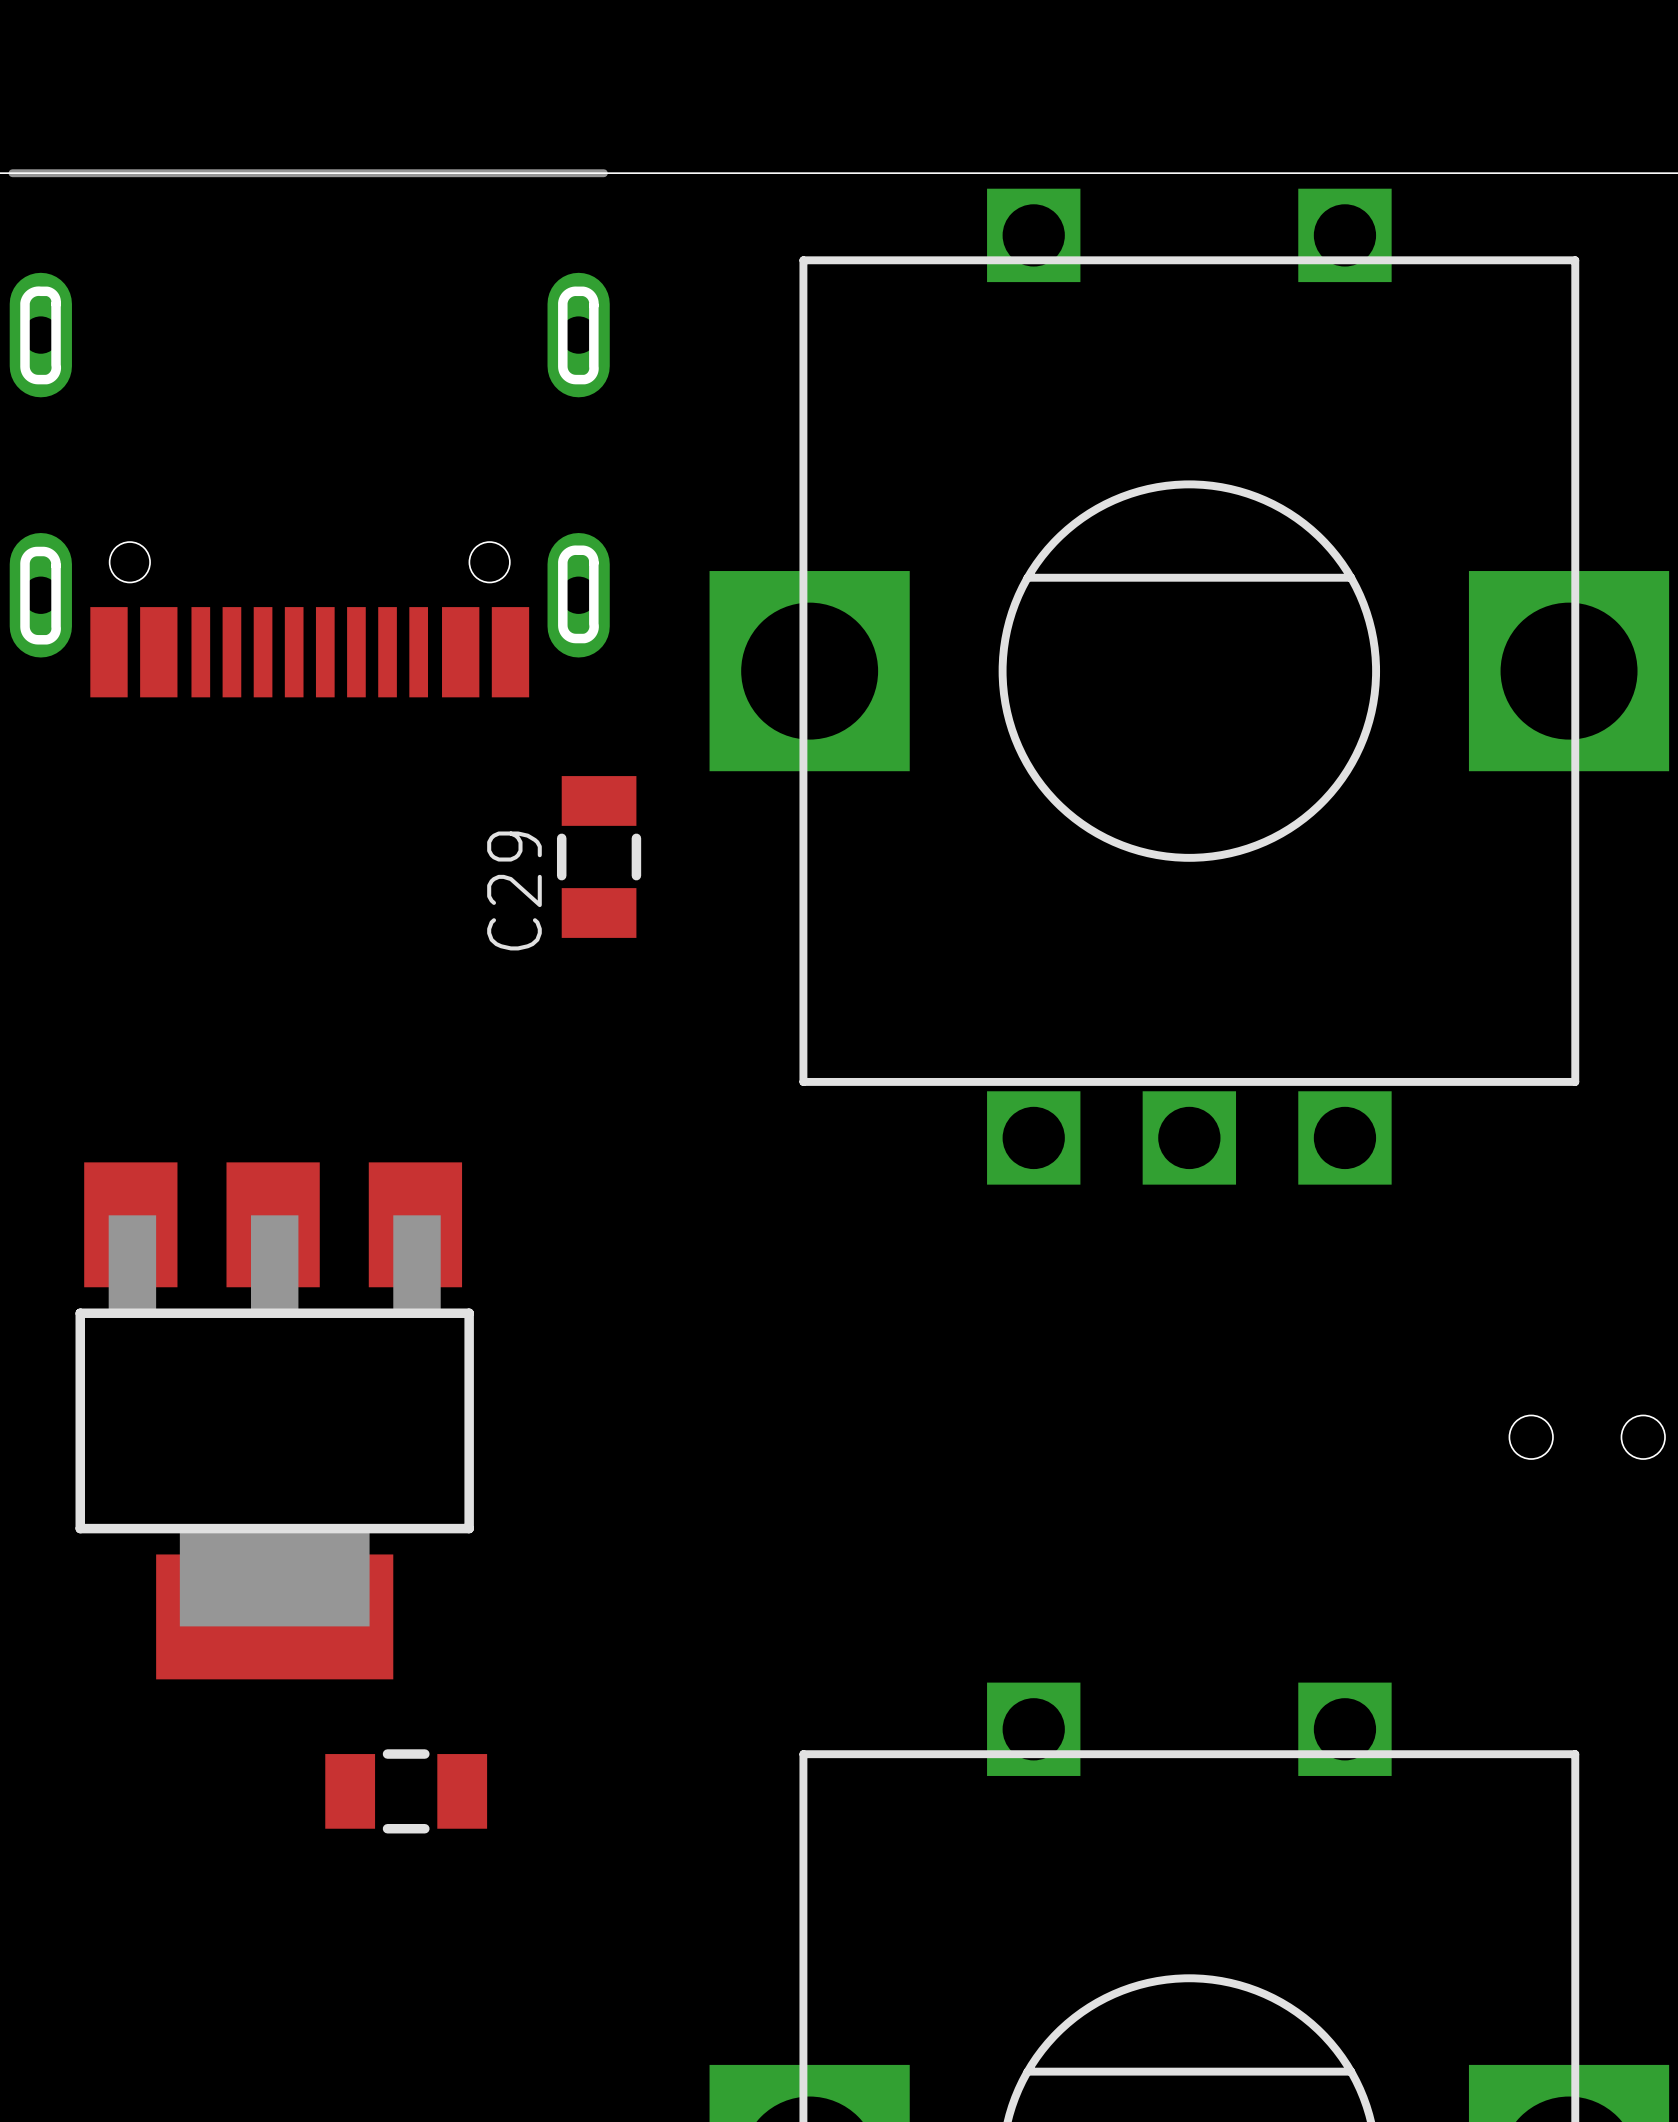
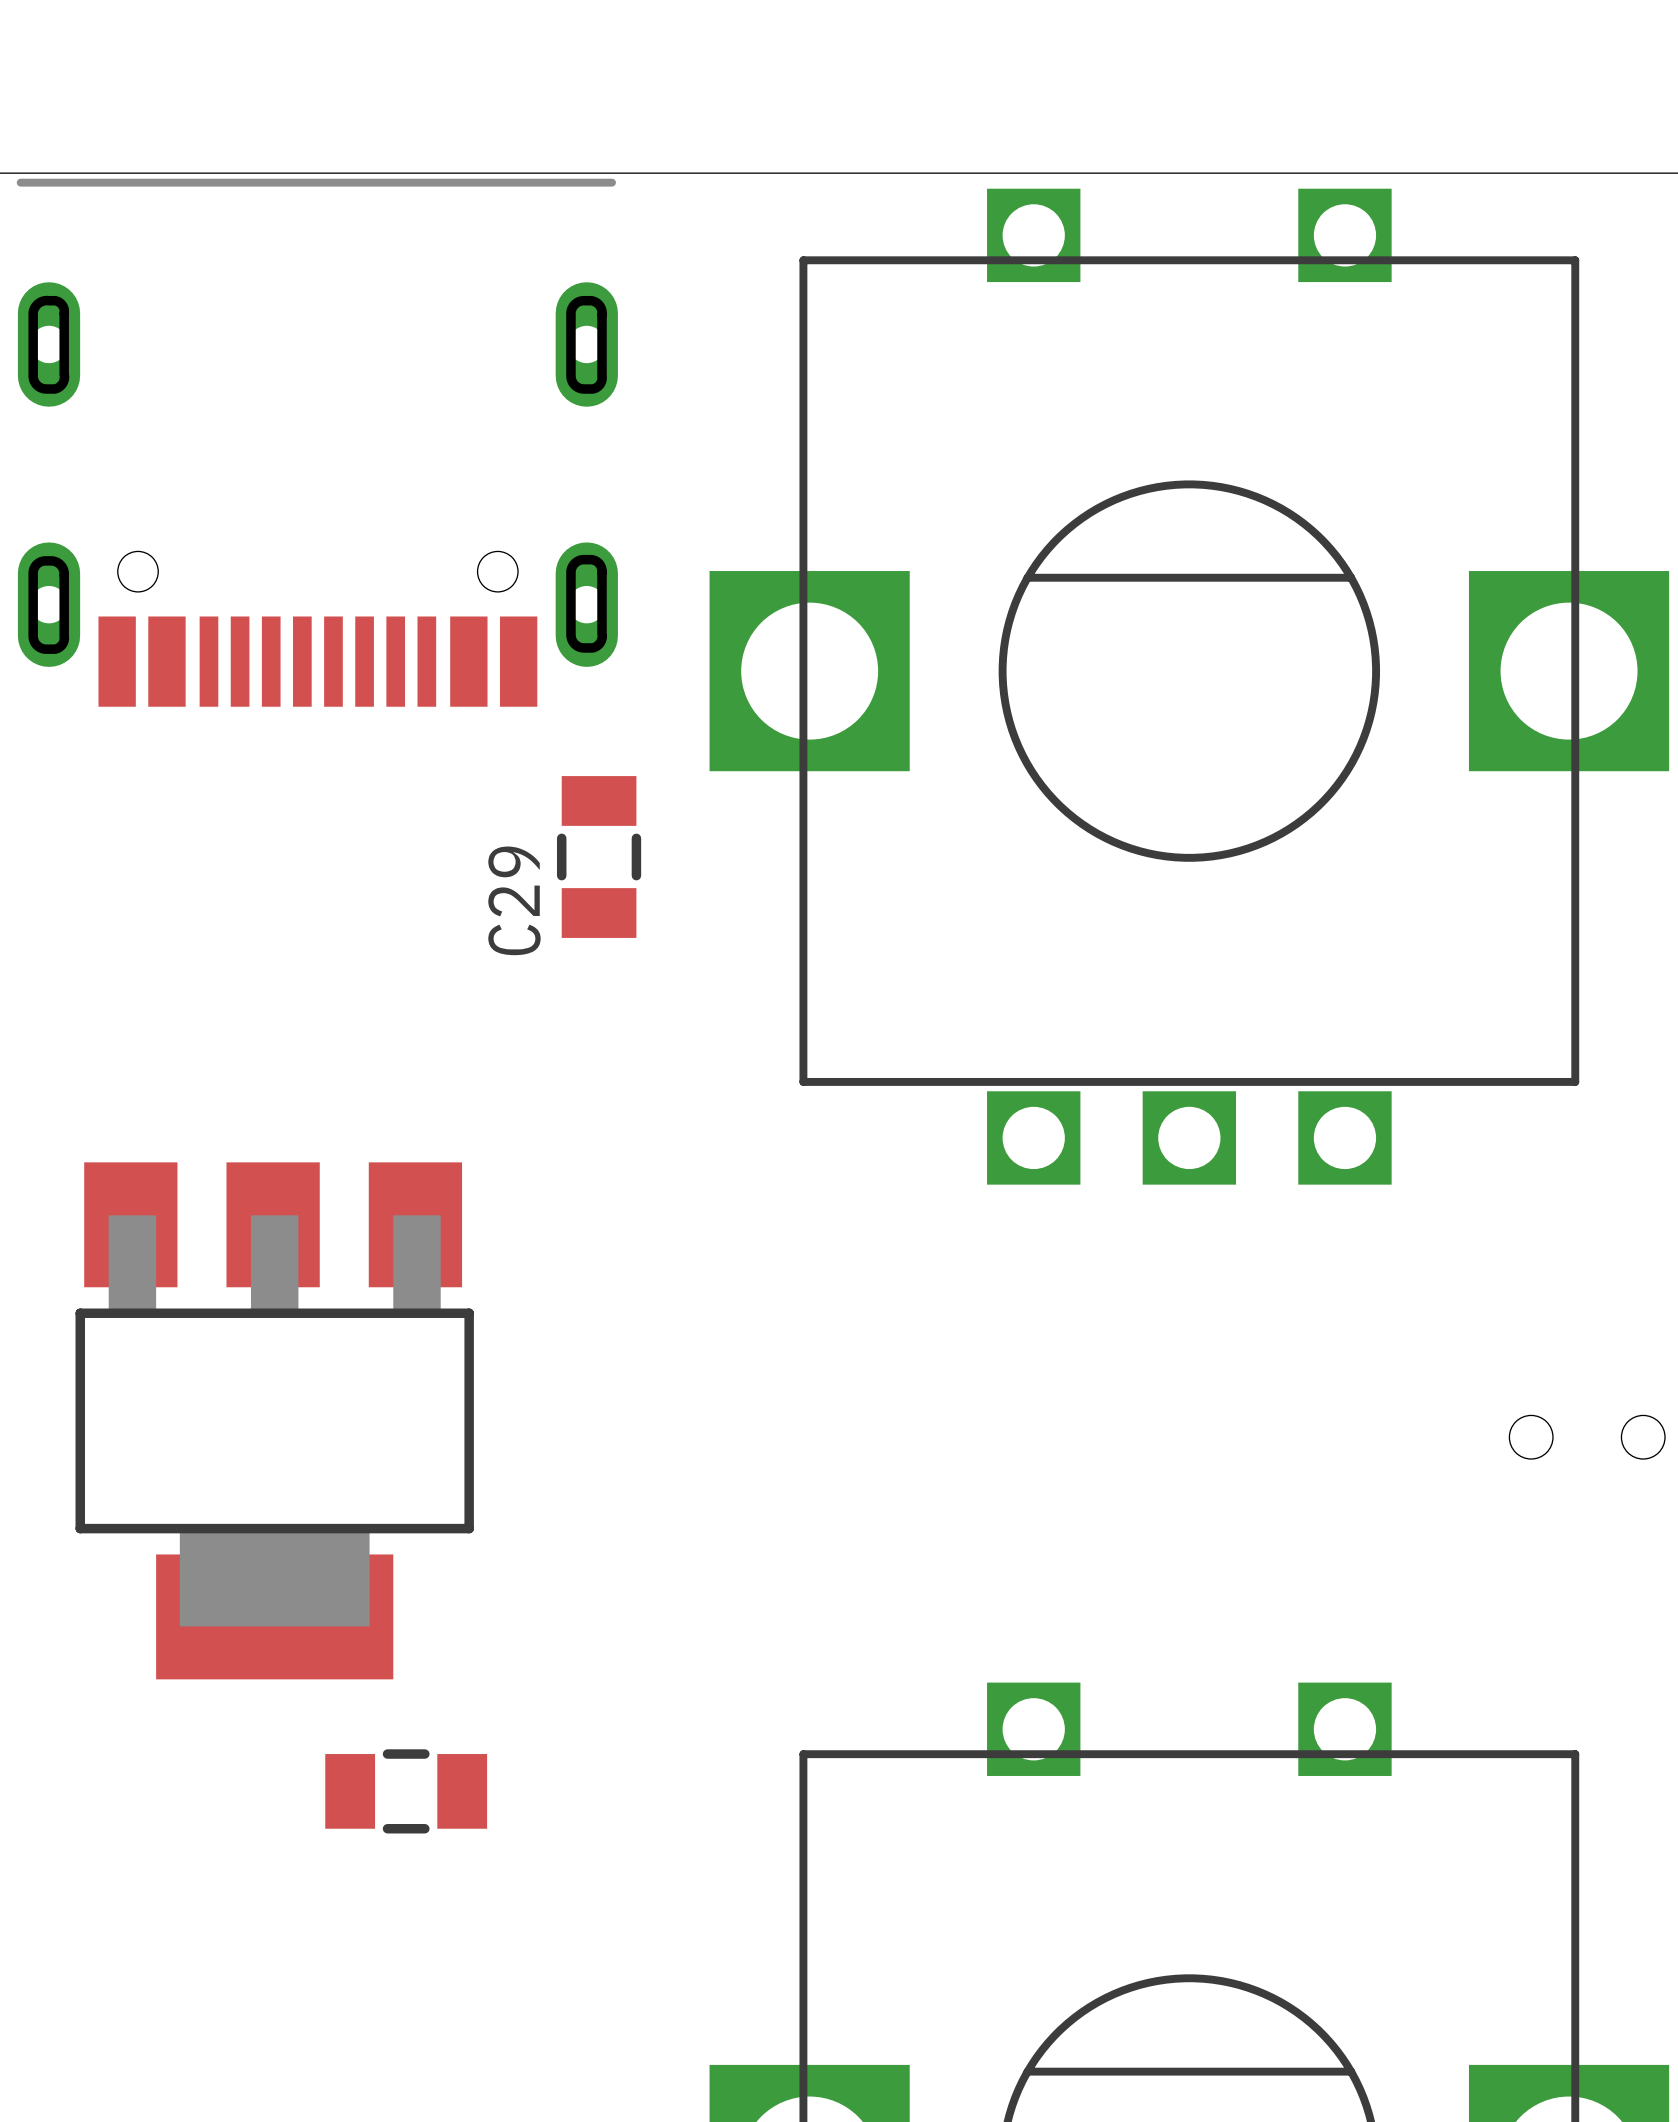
part position: (309, 433) -> (317, 442)

